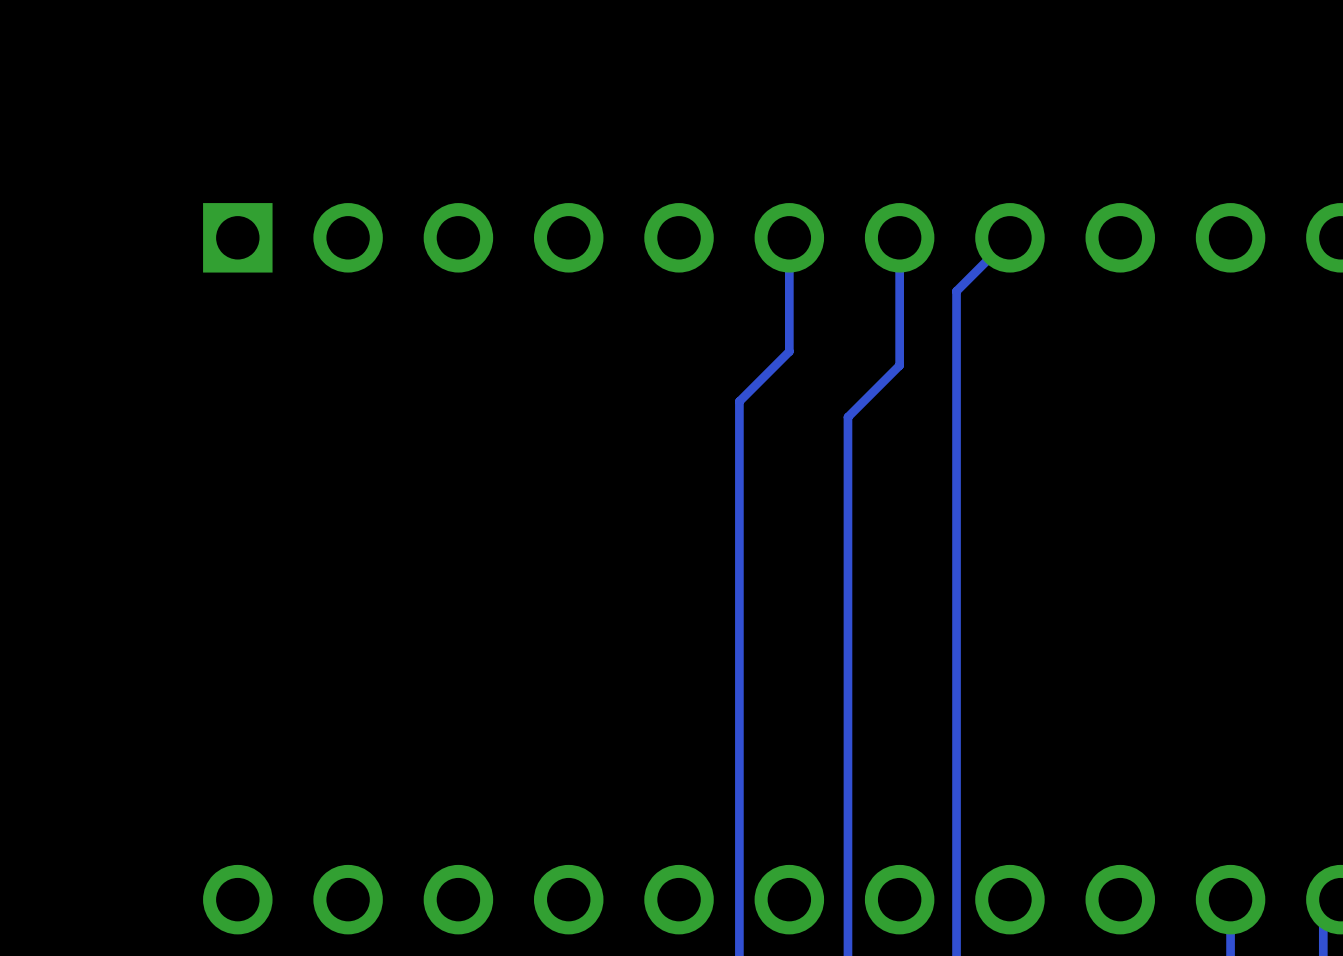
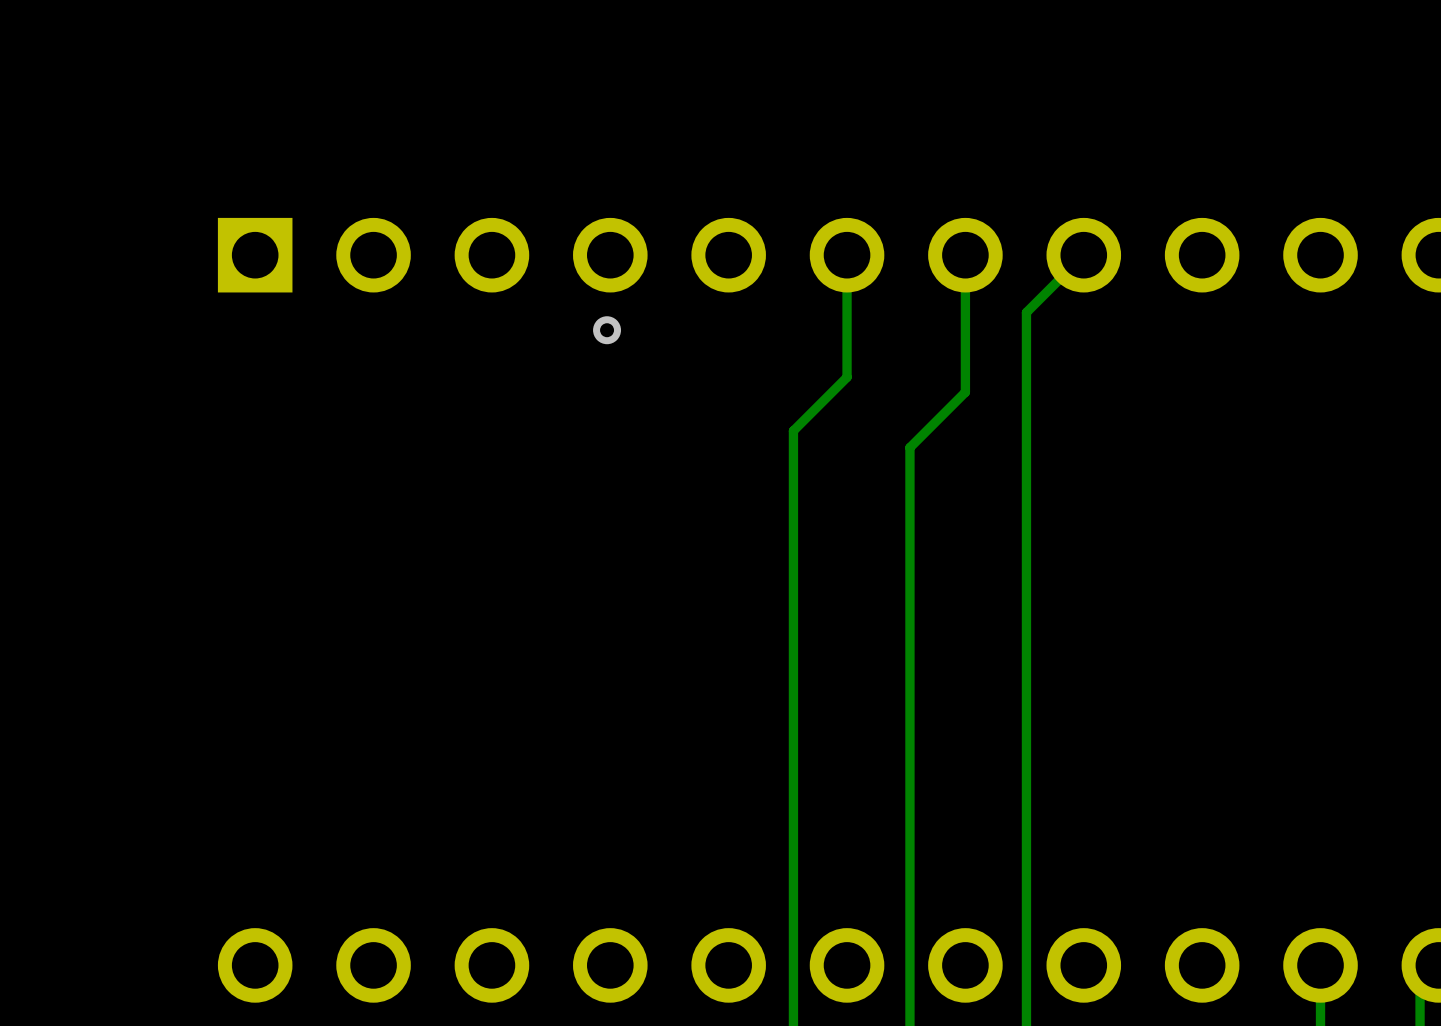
via: none -> (607, 330)

